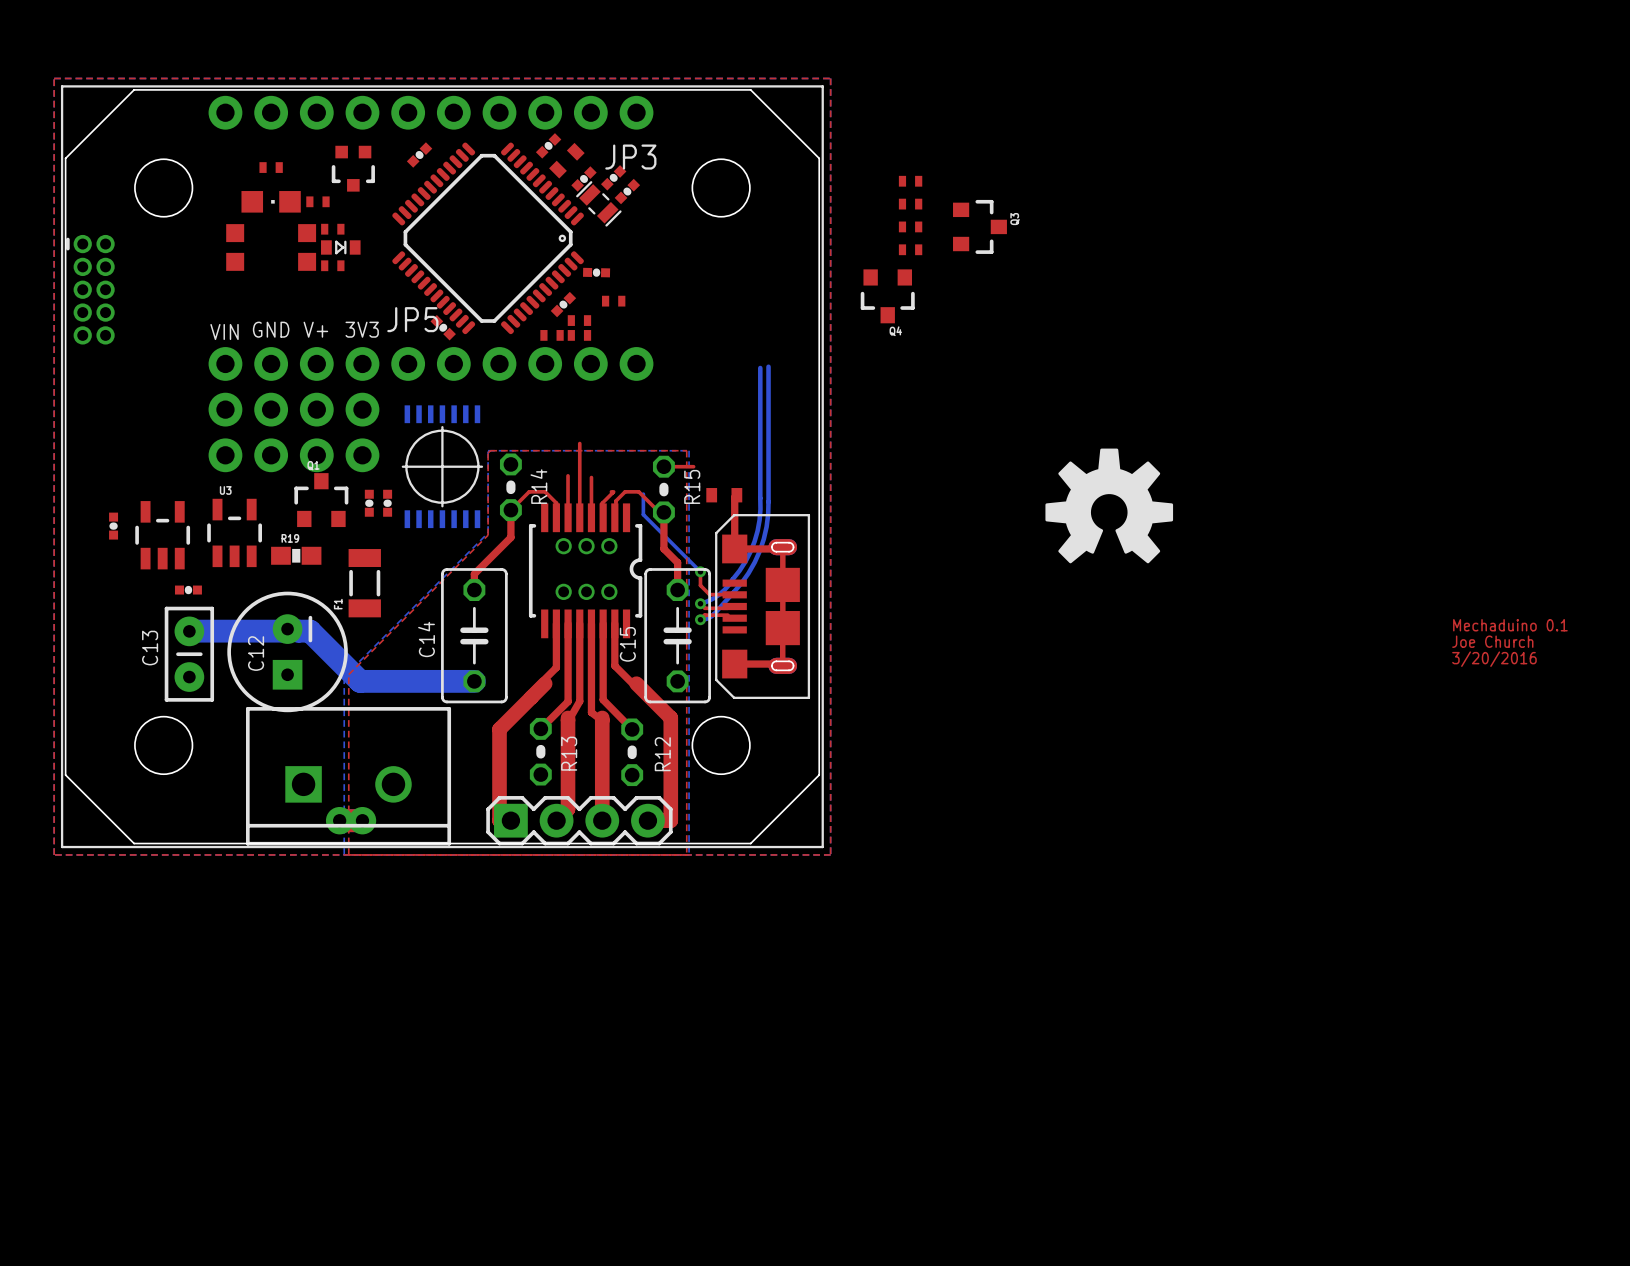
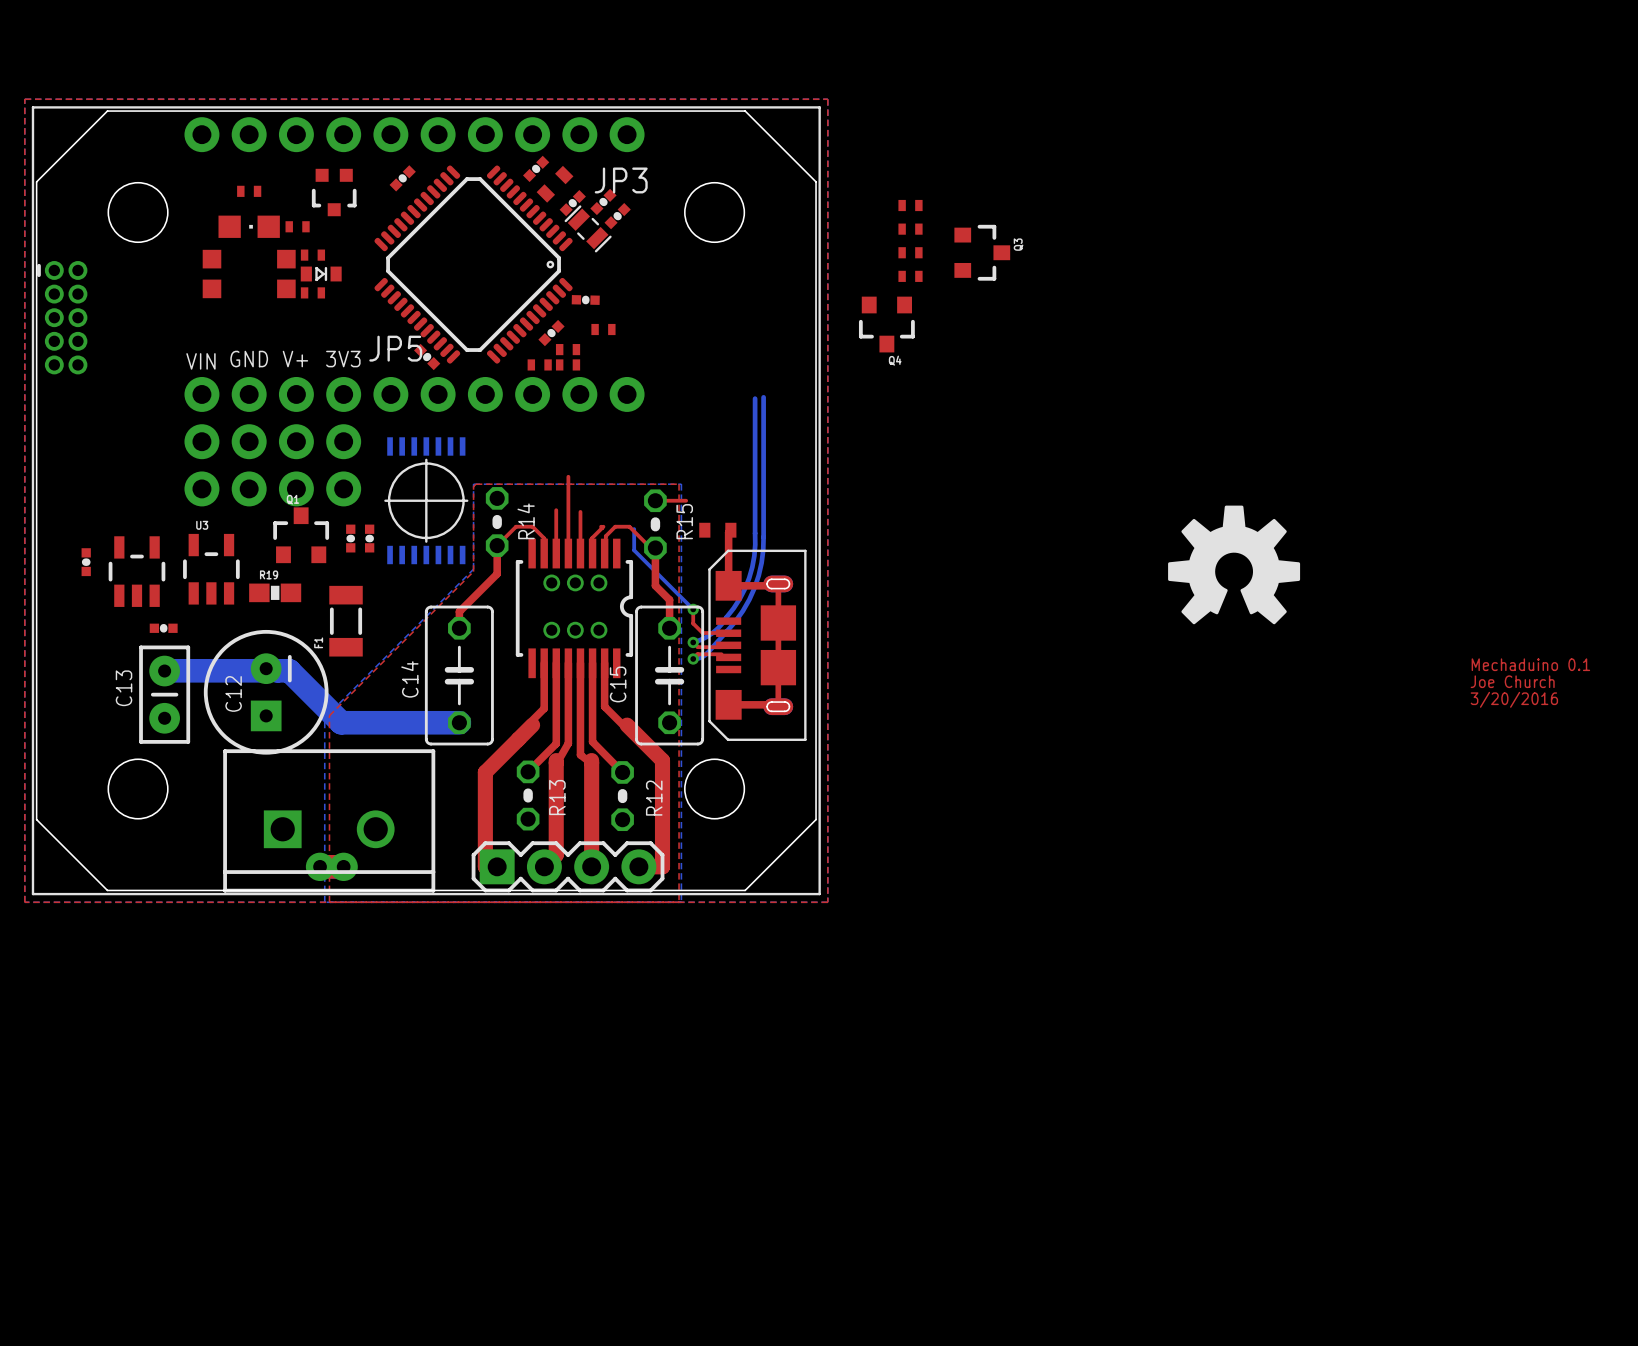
drawing position: (1109, 505) -> (1234, 564)

